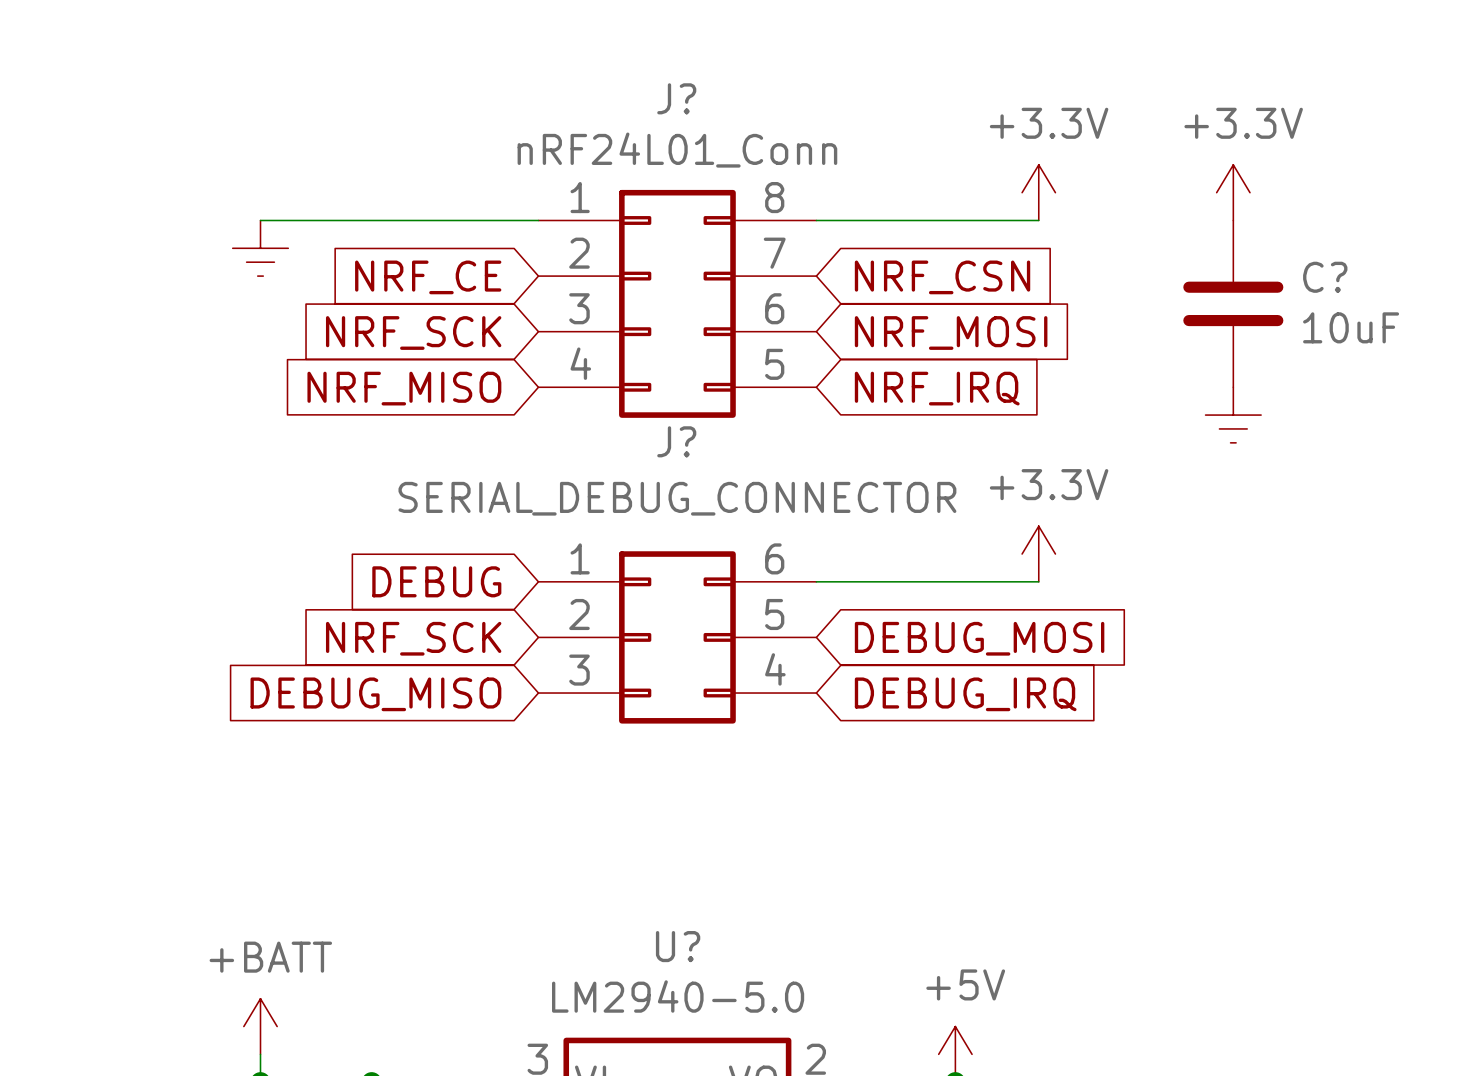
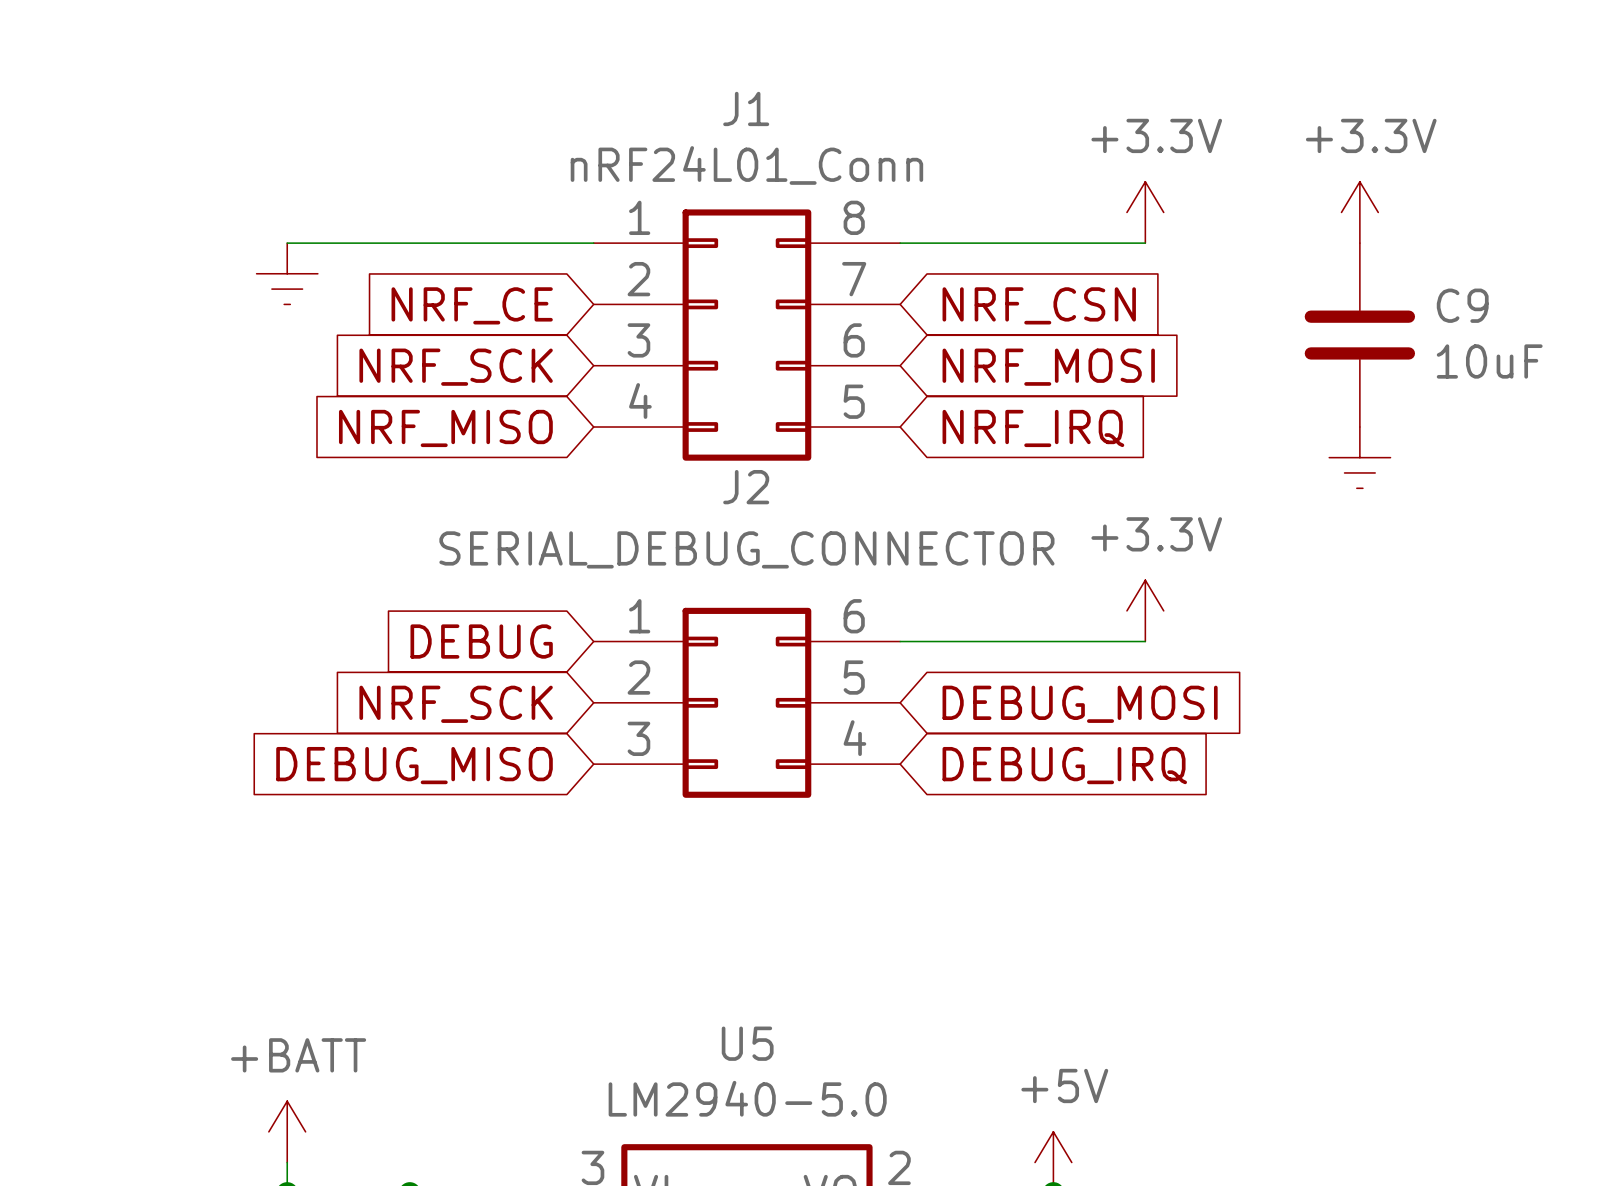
J? name: J? (676, 98) -> J1 (746, 108)
C? name: C? (1325, 277) -> C9 (1462, 305)
J? name: J? (676, 441) -> J2 (746, 487)
U? name: U? (678, 946) -> U5 (747, 1043)

